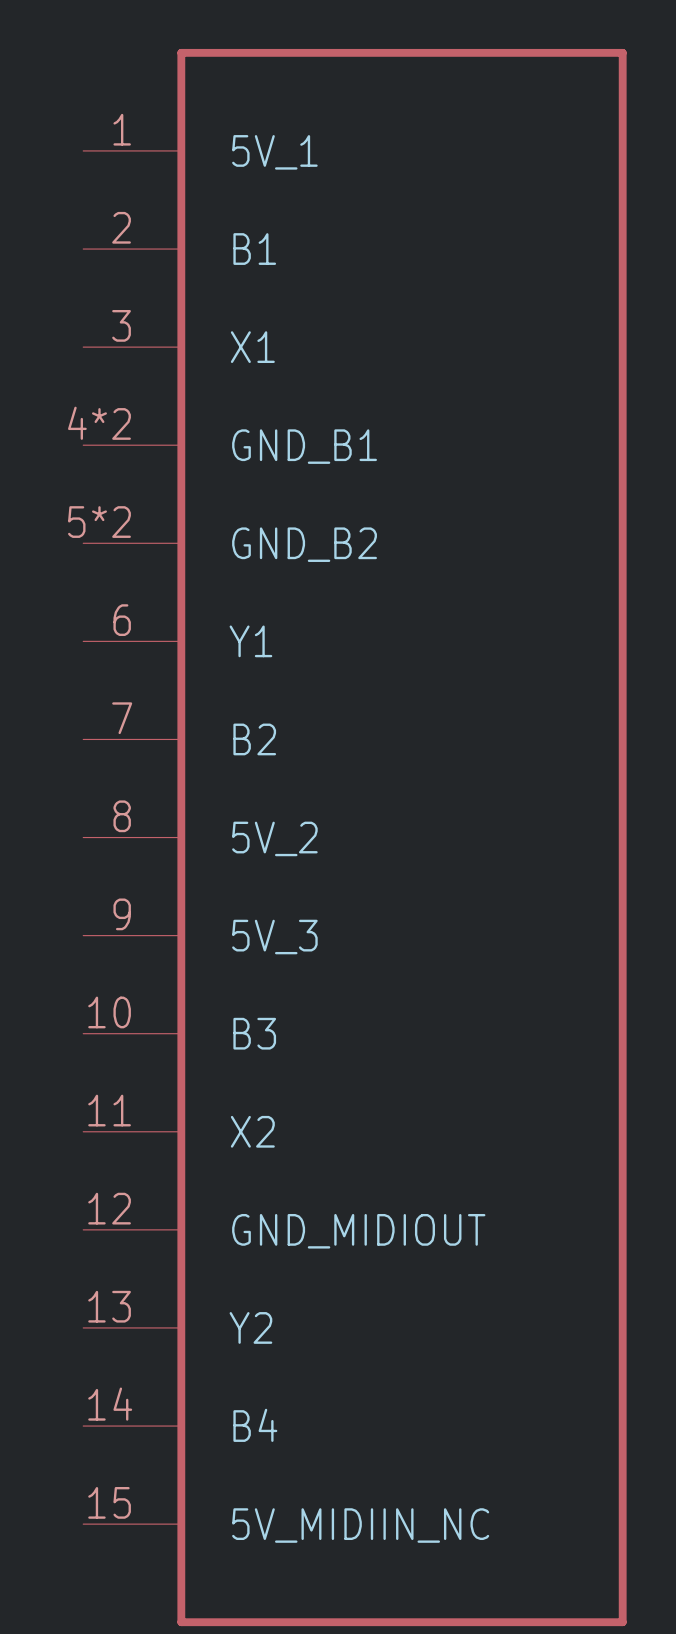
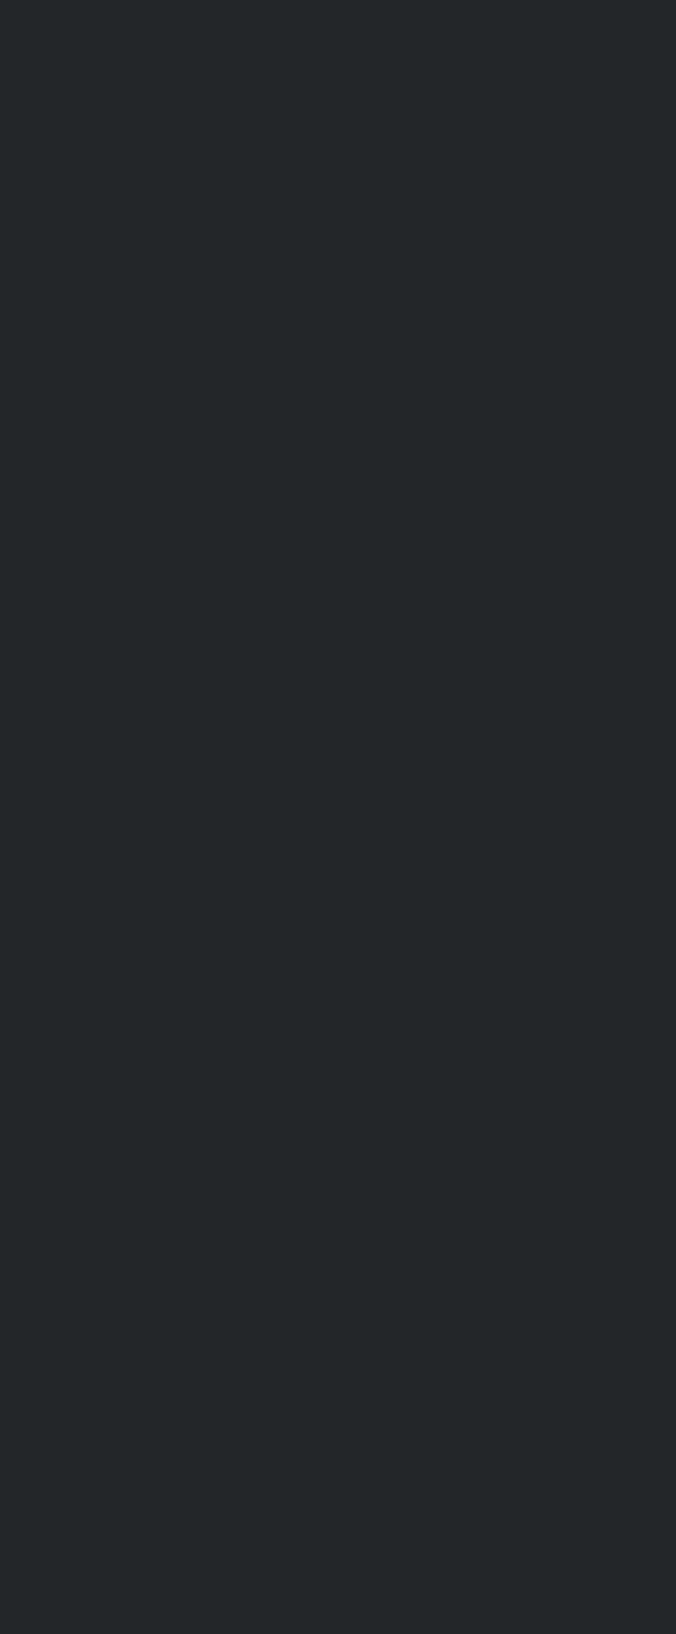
part: (354, 837) -> none

